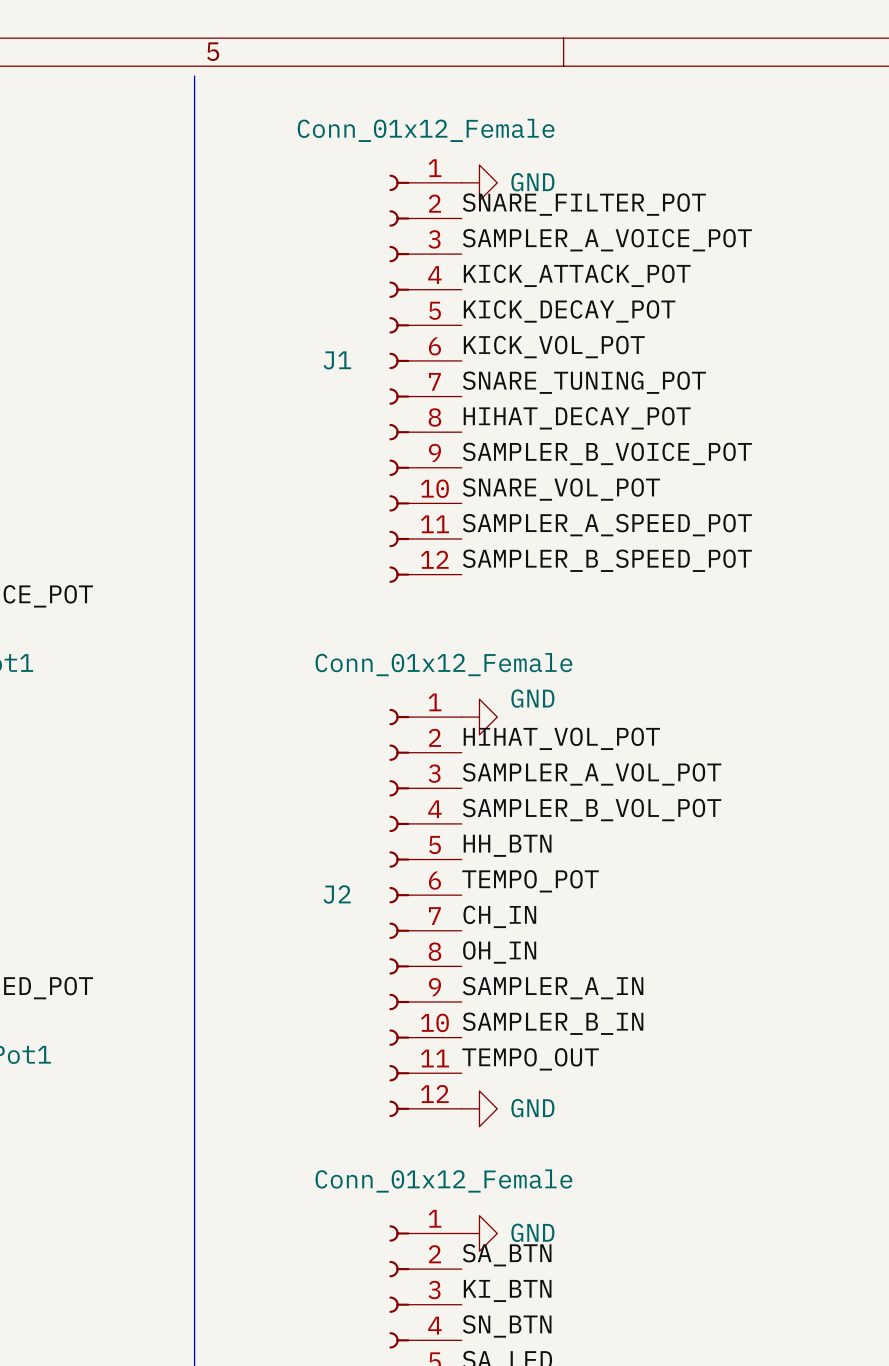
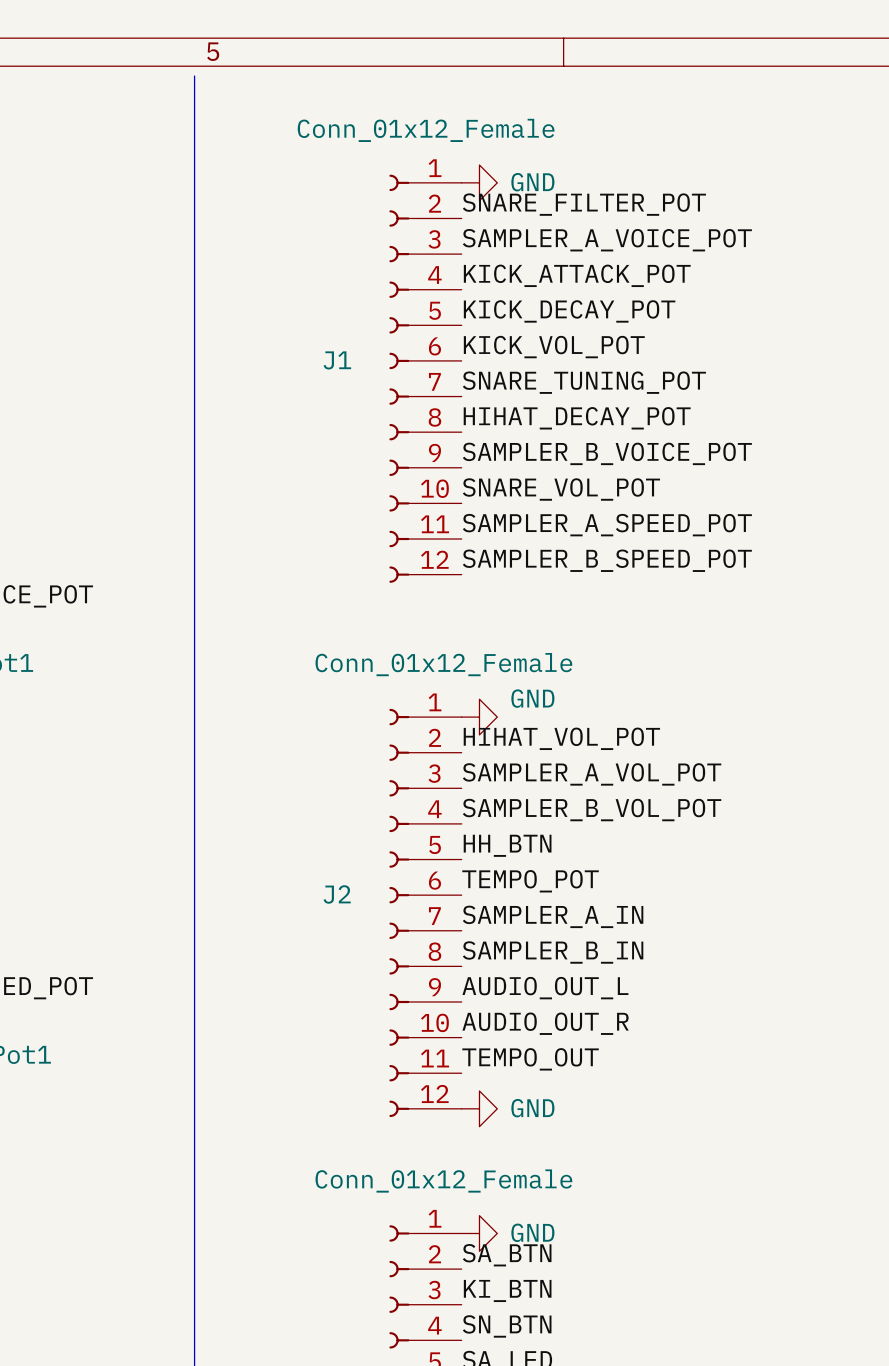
label: CH_IN (499, 916) -> SAMPLER_A_IN (553, 916)
label: OH_IN (499, 952) -> SAMPLER_B_IN (553, 952)
label: SAMPLER_A_IN (553, 988) -> AUDIO_OUT_L (545, 988)
label: SAMPLER_B_IN (553, 1023) -> AUDIO_OUT_R (545, 1023)

